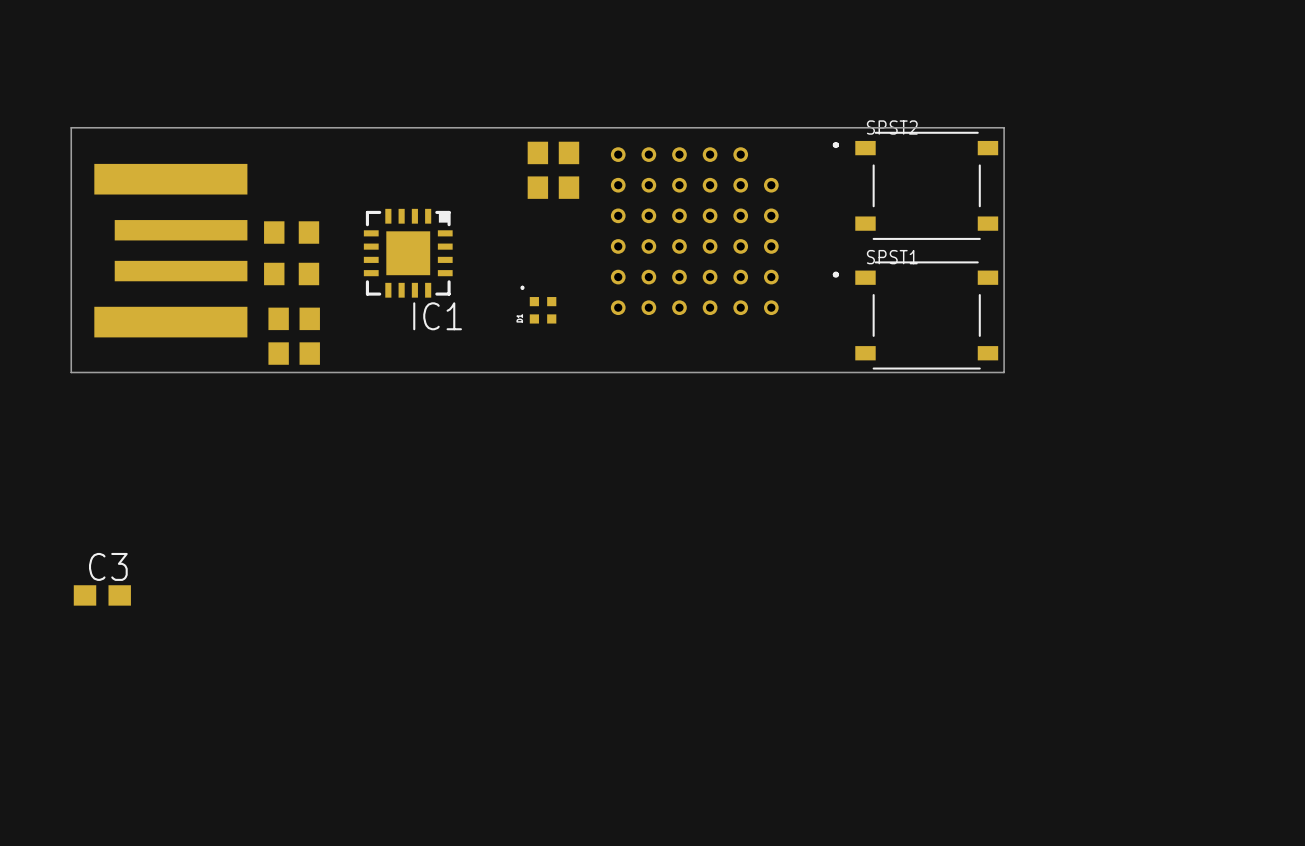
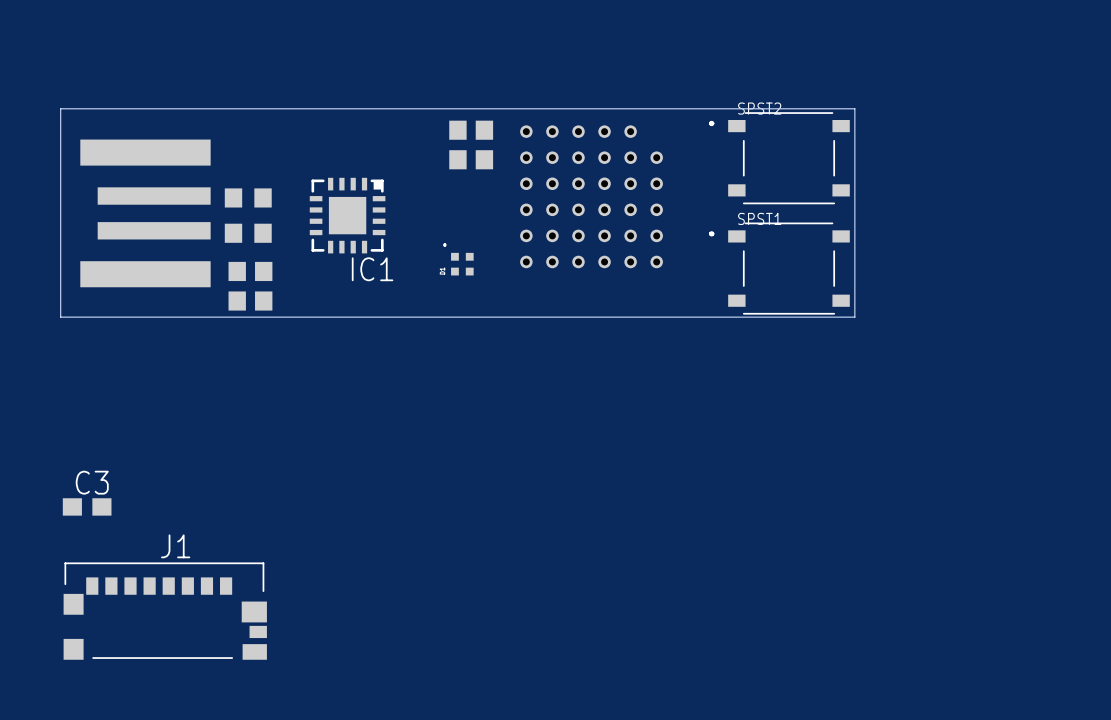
J1: none -> (165, 611)

